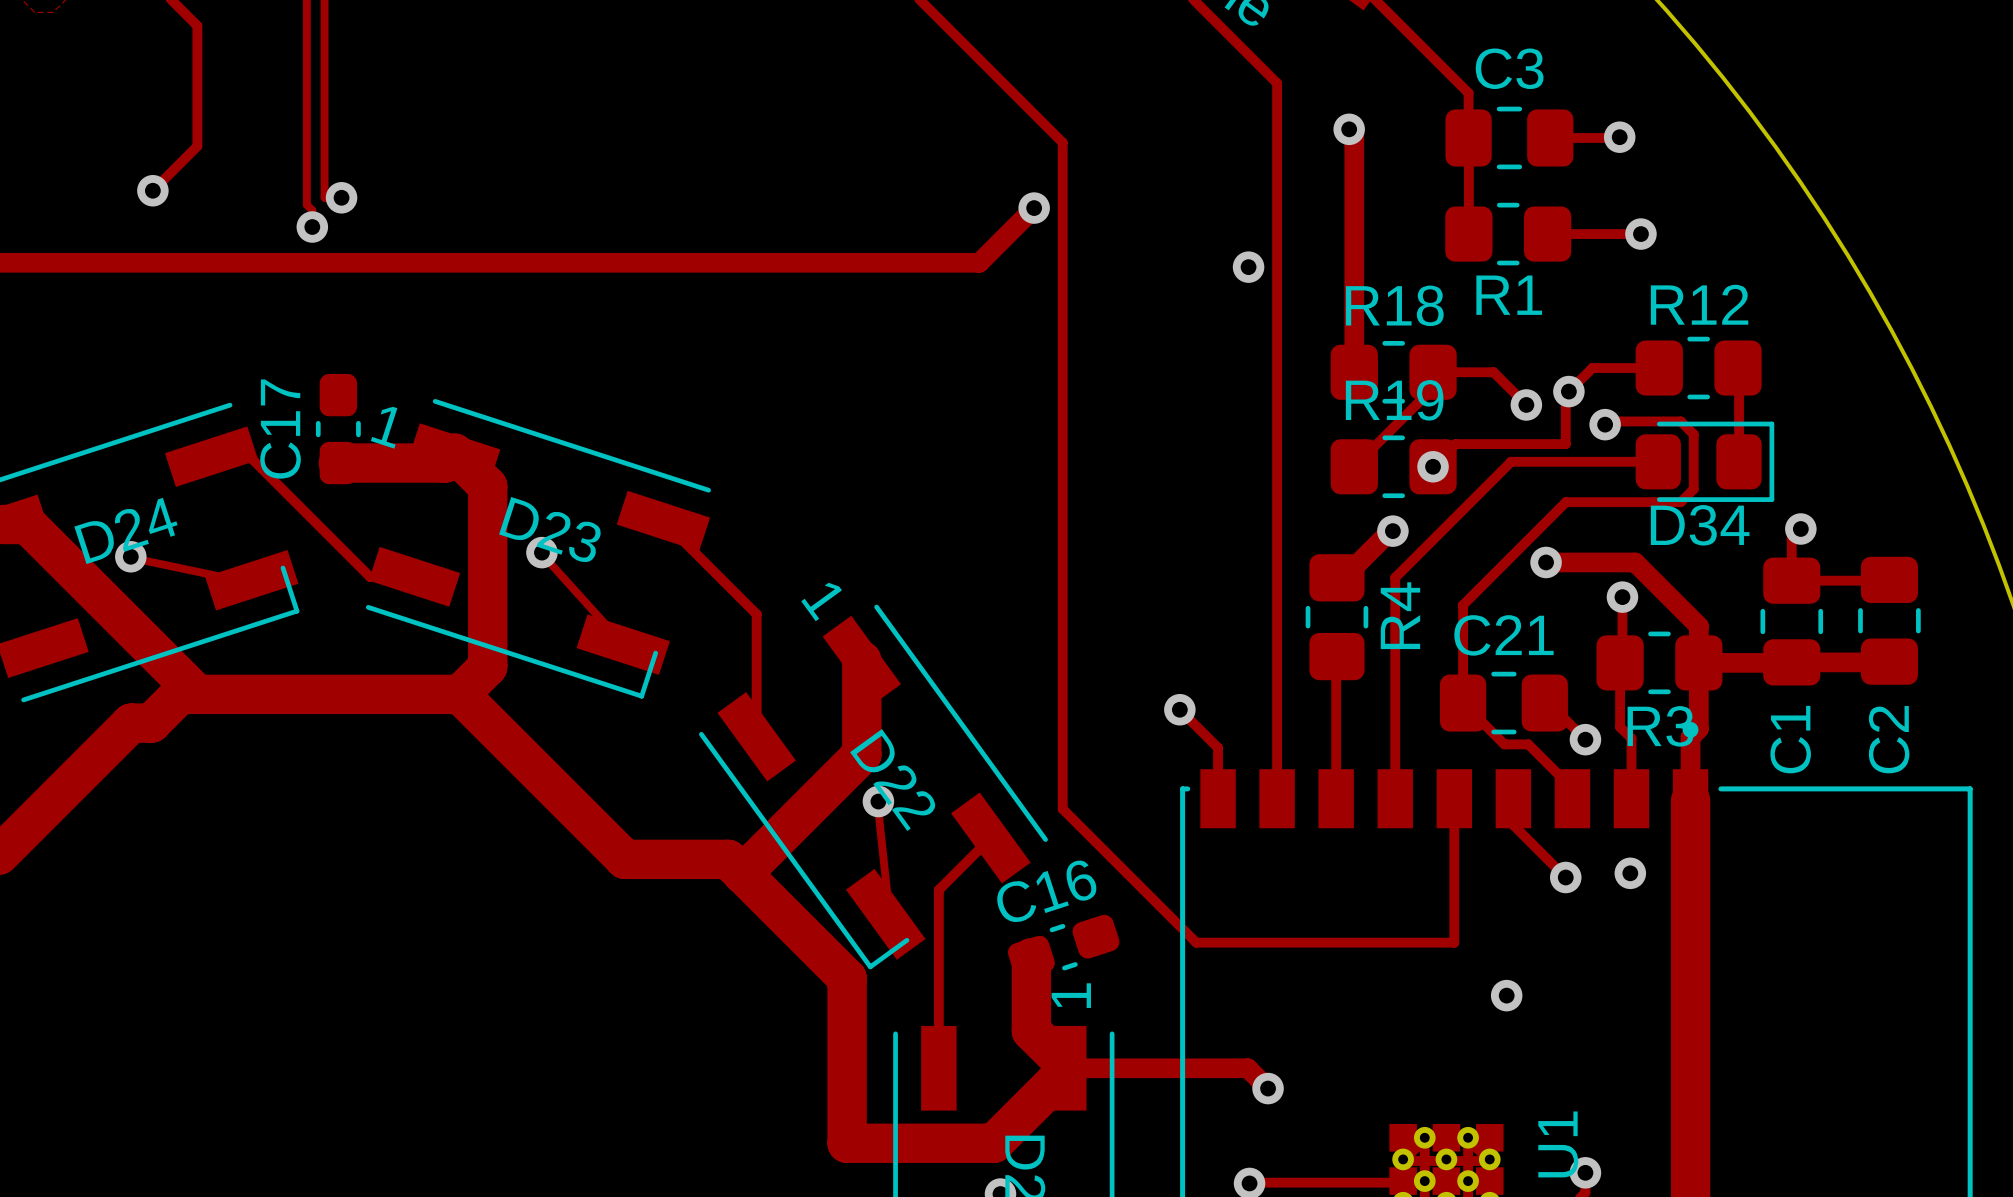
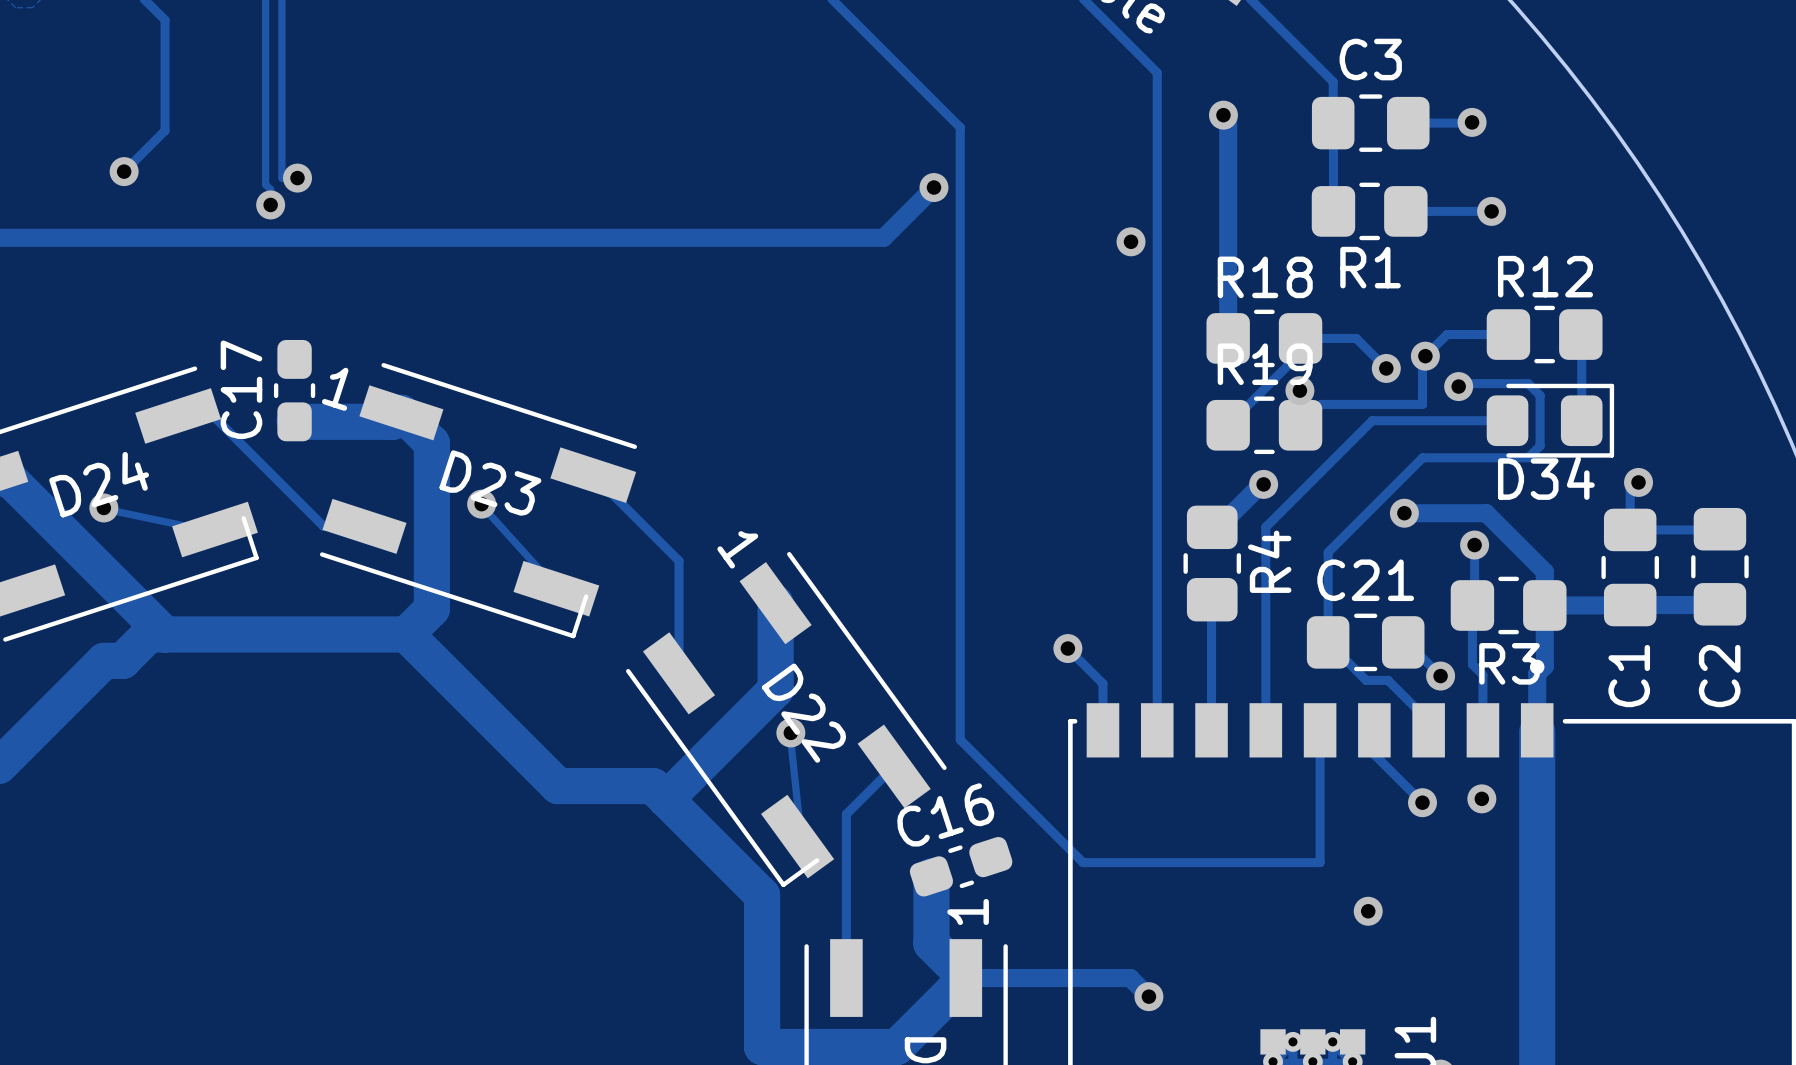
via position: (1433, 466) -> (1299, 390)

